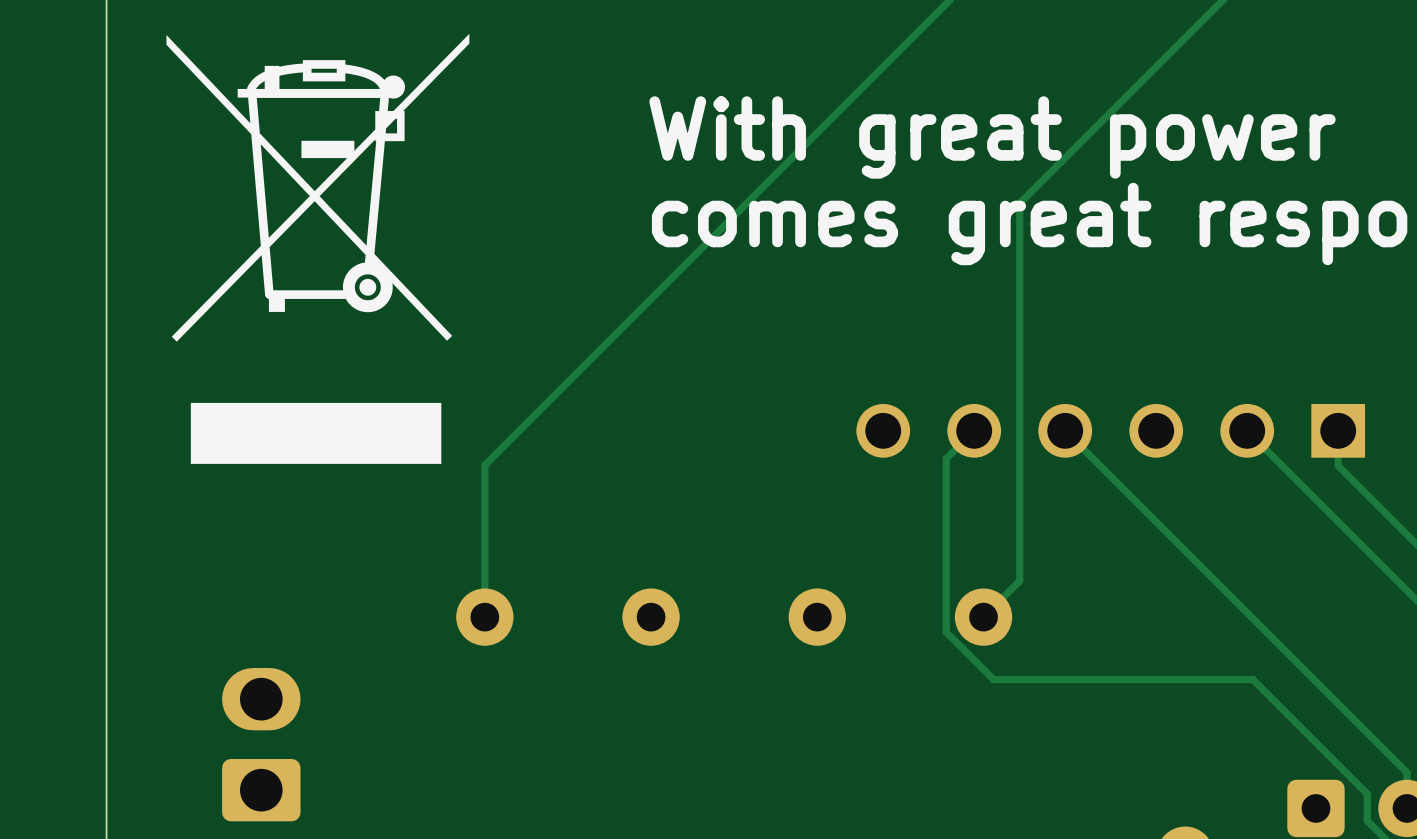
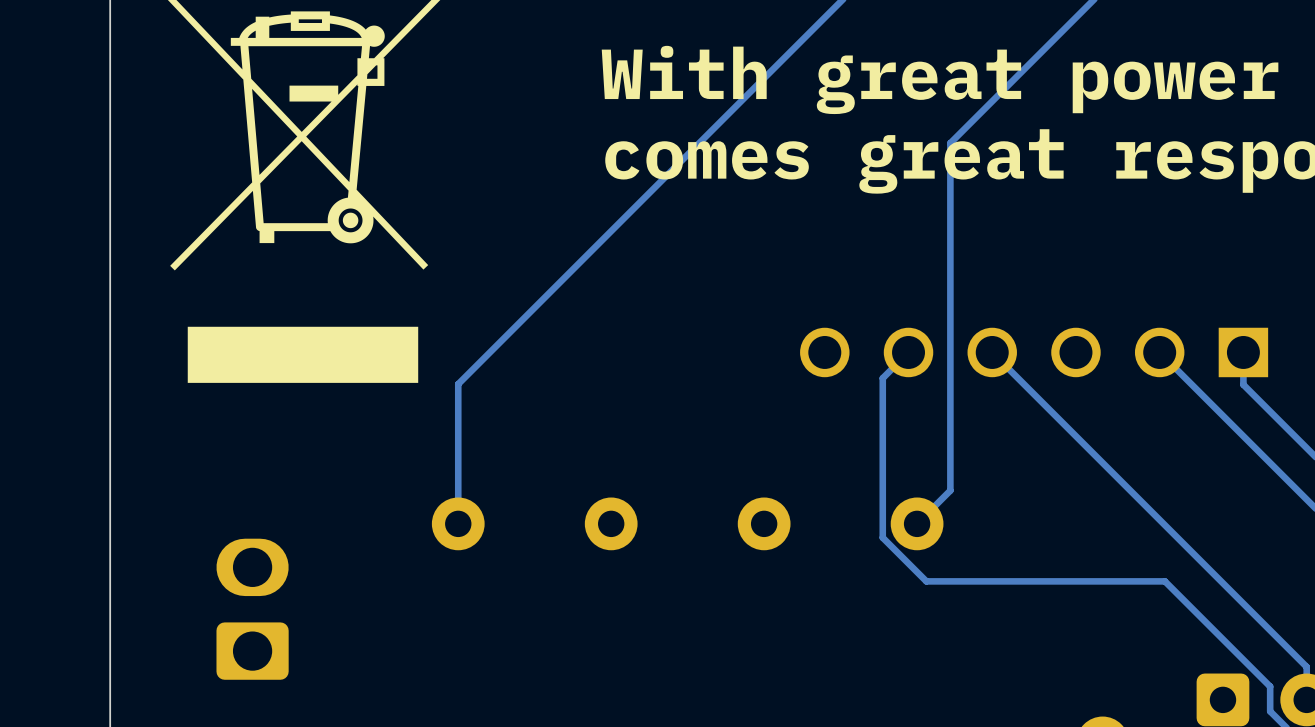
part position: (261, 744) -> (252, 609)

